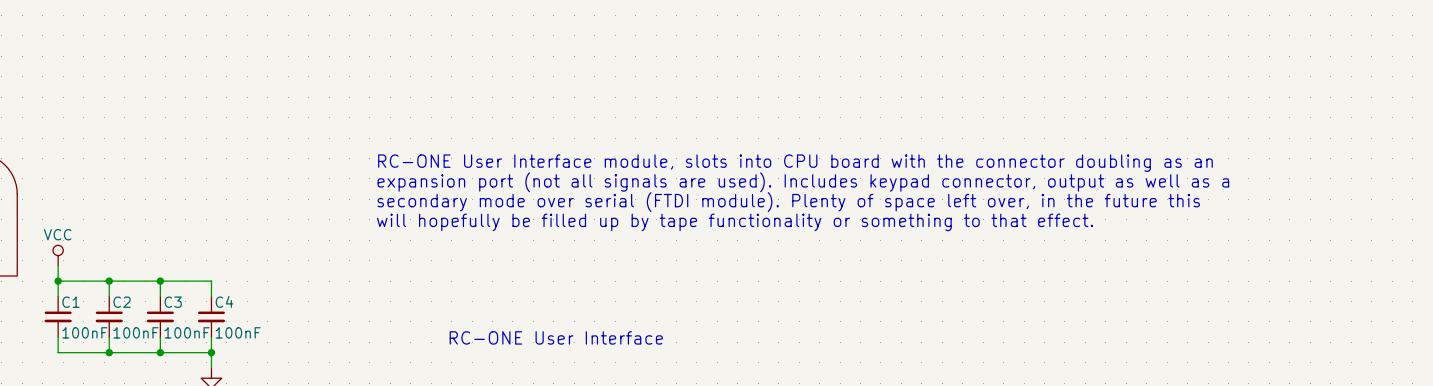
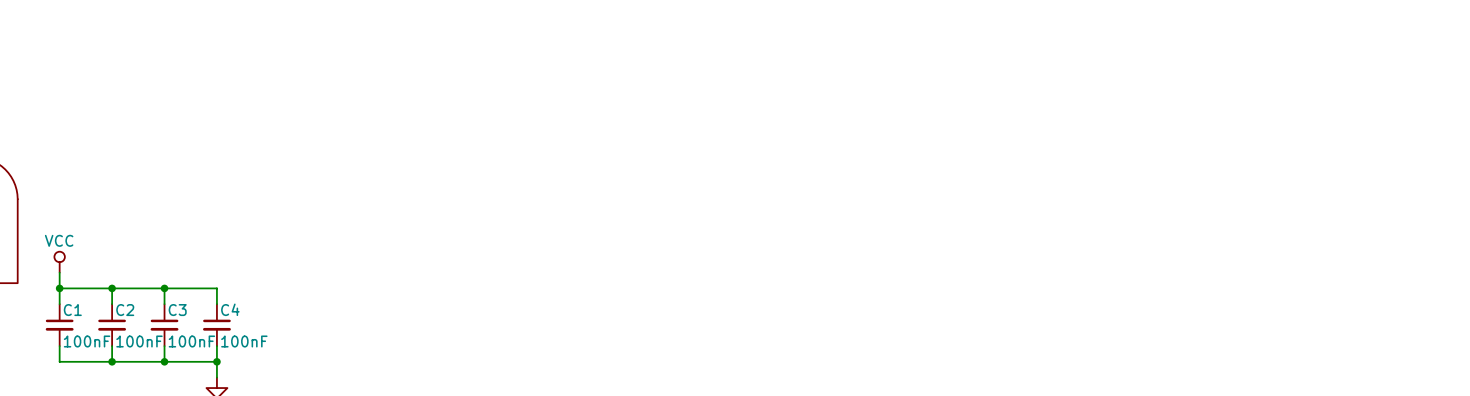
text: RC-ONE User Interface module, slots into CPU board with the connector doubling as an (795, 163) -> none
text: expansion port (not all signals are used). Includes keypad connector, output as well as a (803, 182) -> none
text: secondary mode over serial (FTDI module). Plenty of space left over, in the future this (788, 202) -> none
text: will hopefully be filled up by tape functionality or something to that effect. (735, 222) -> none
text: RC-ONE User Interface (556, 337) -> none

